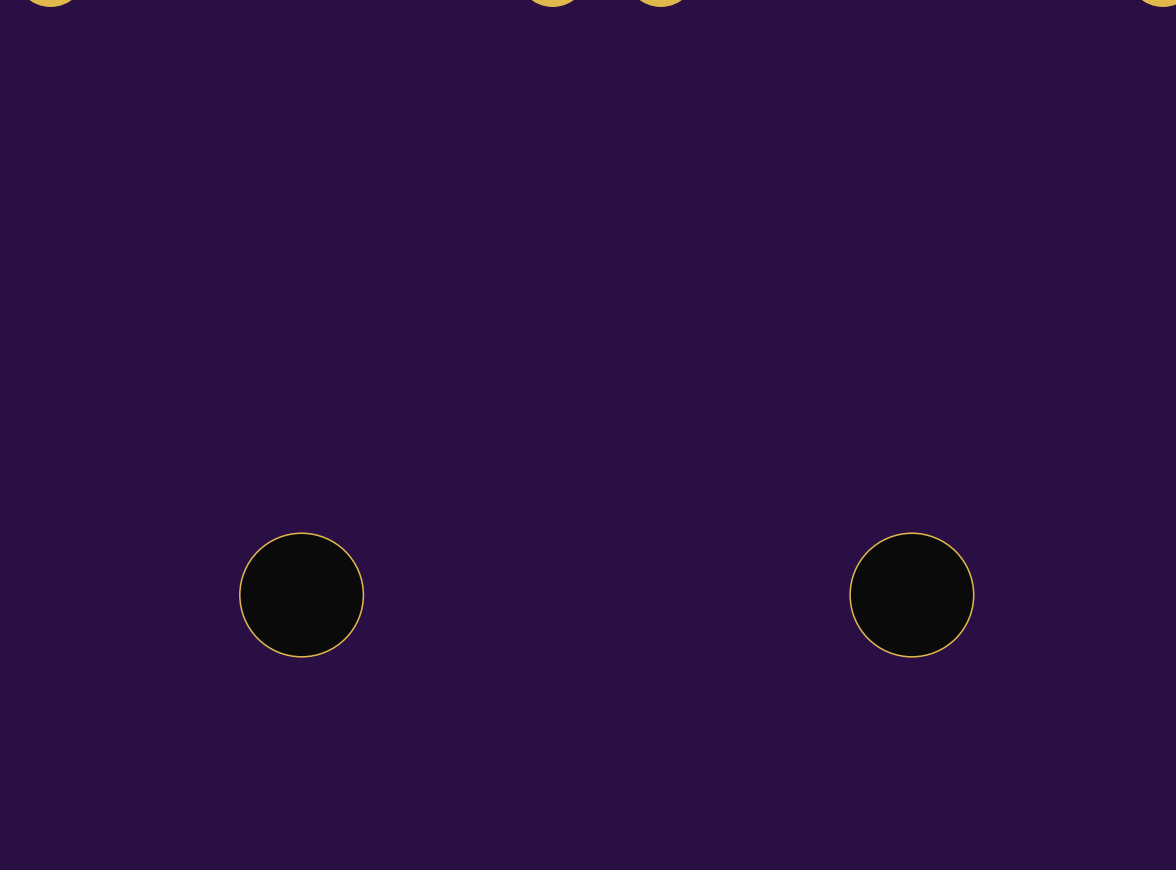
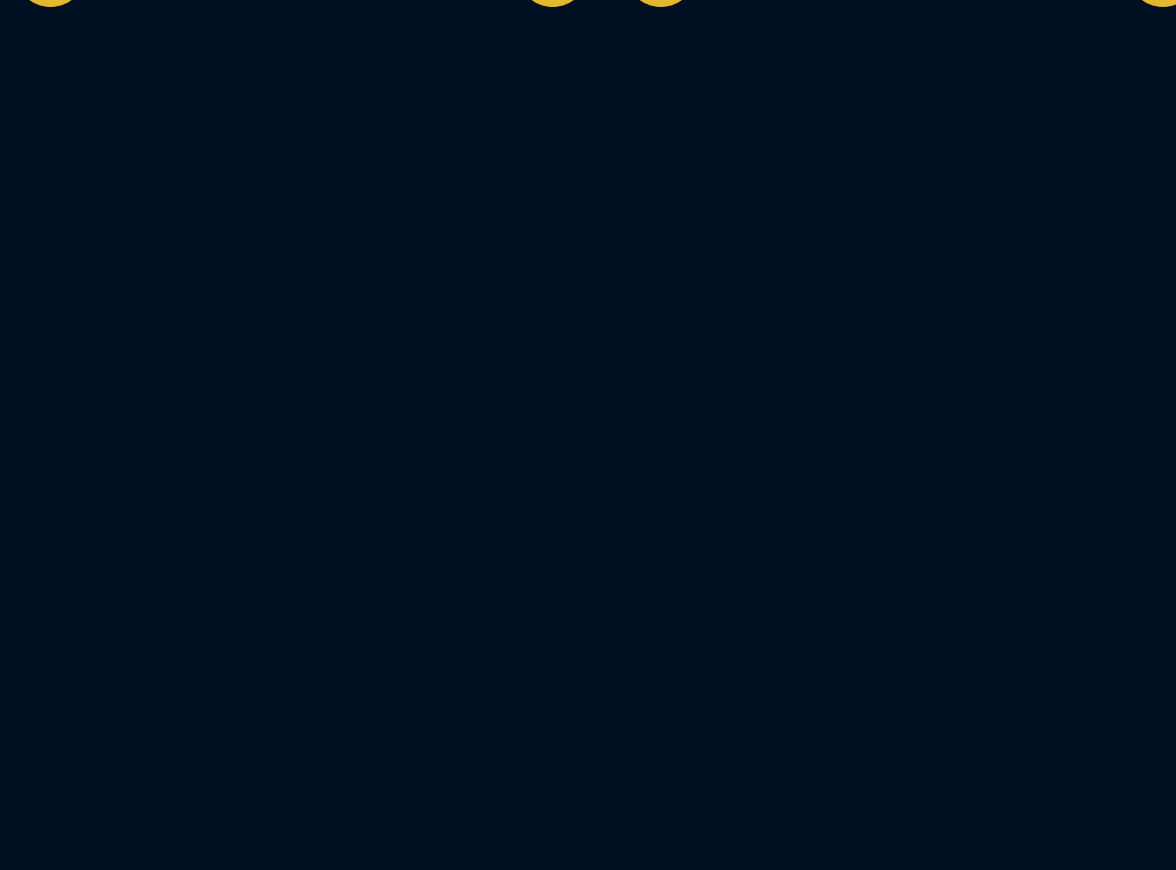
part: (301, 595) -> none
part: (911, 595) -> none

